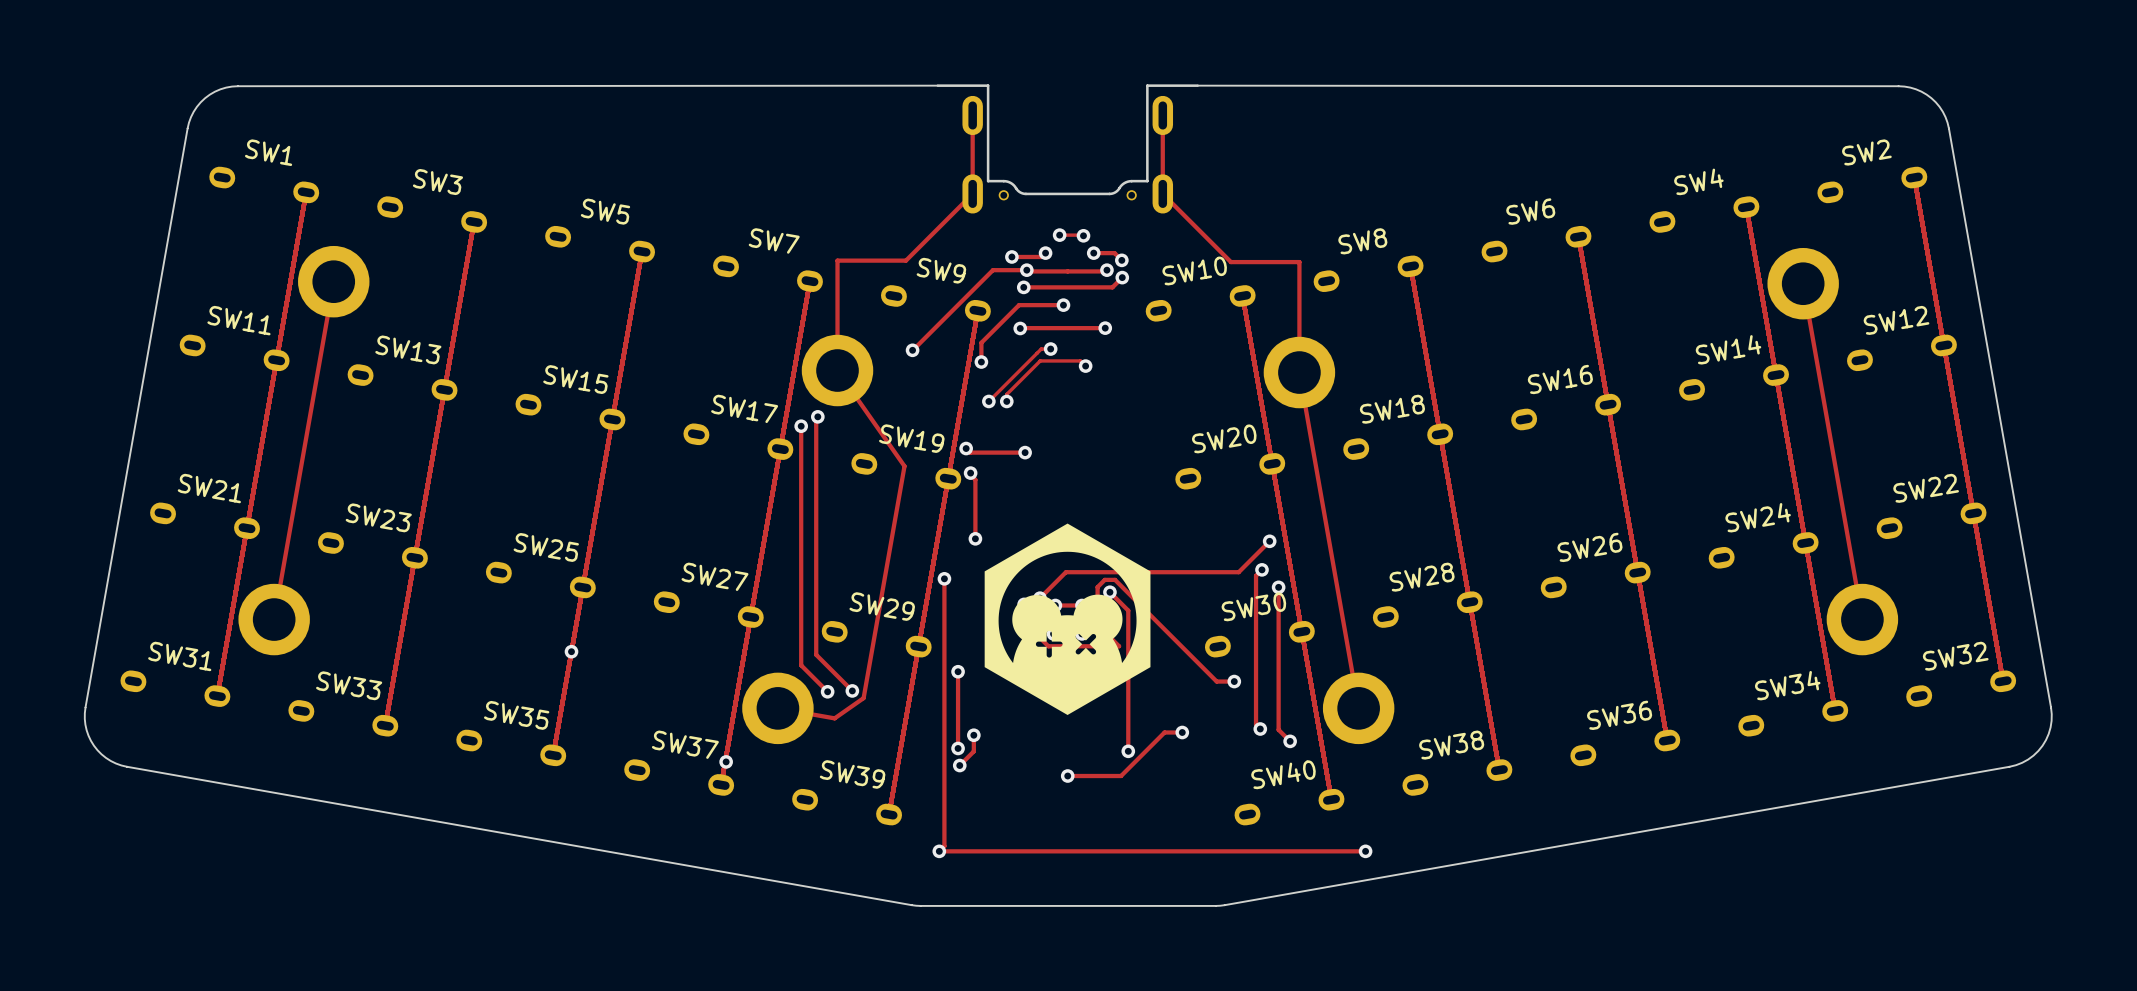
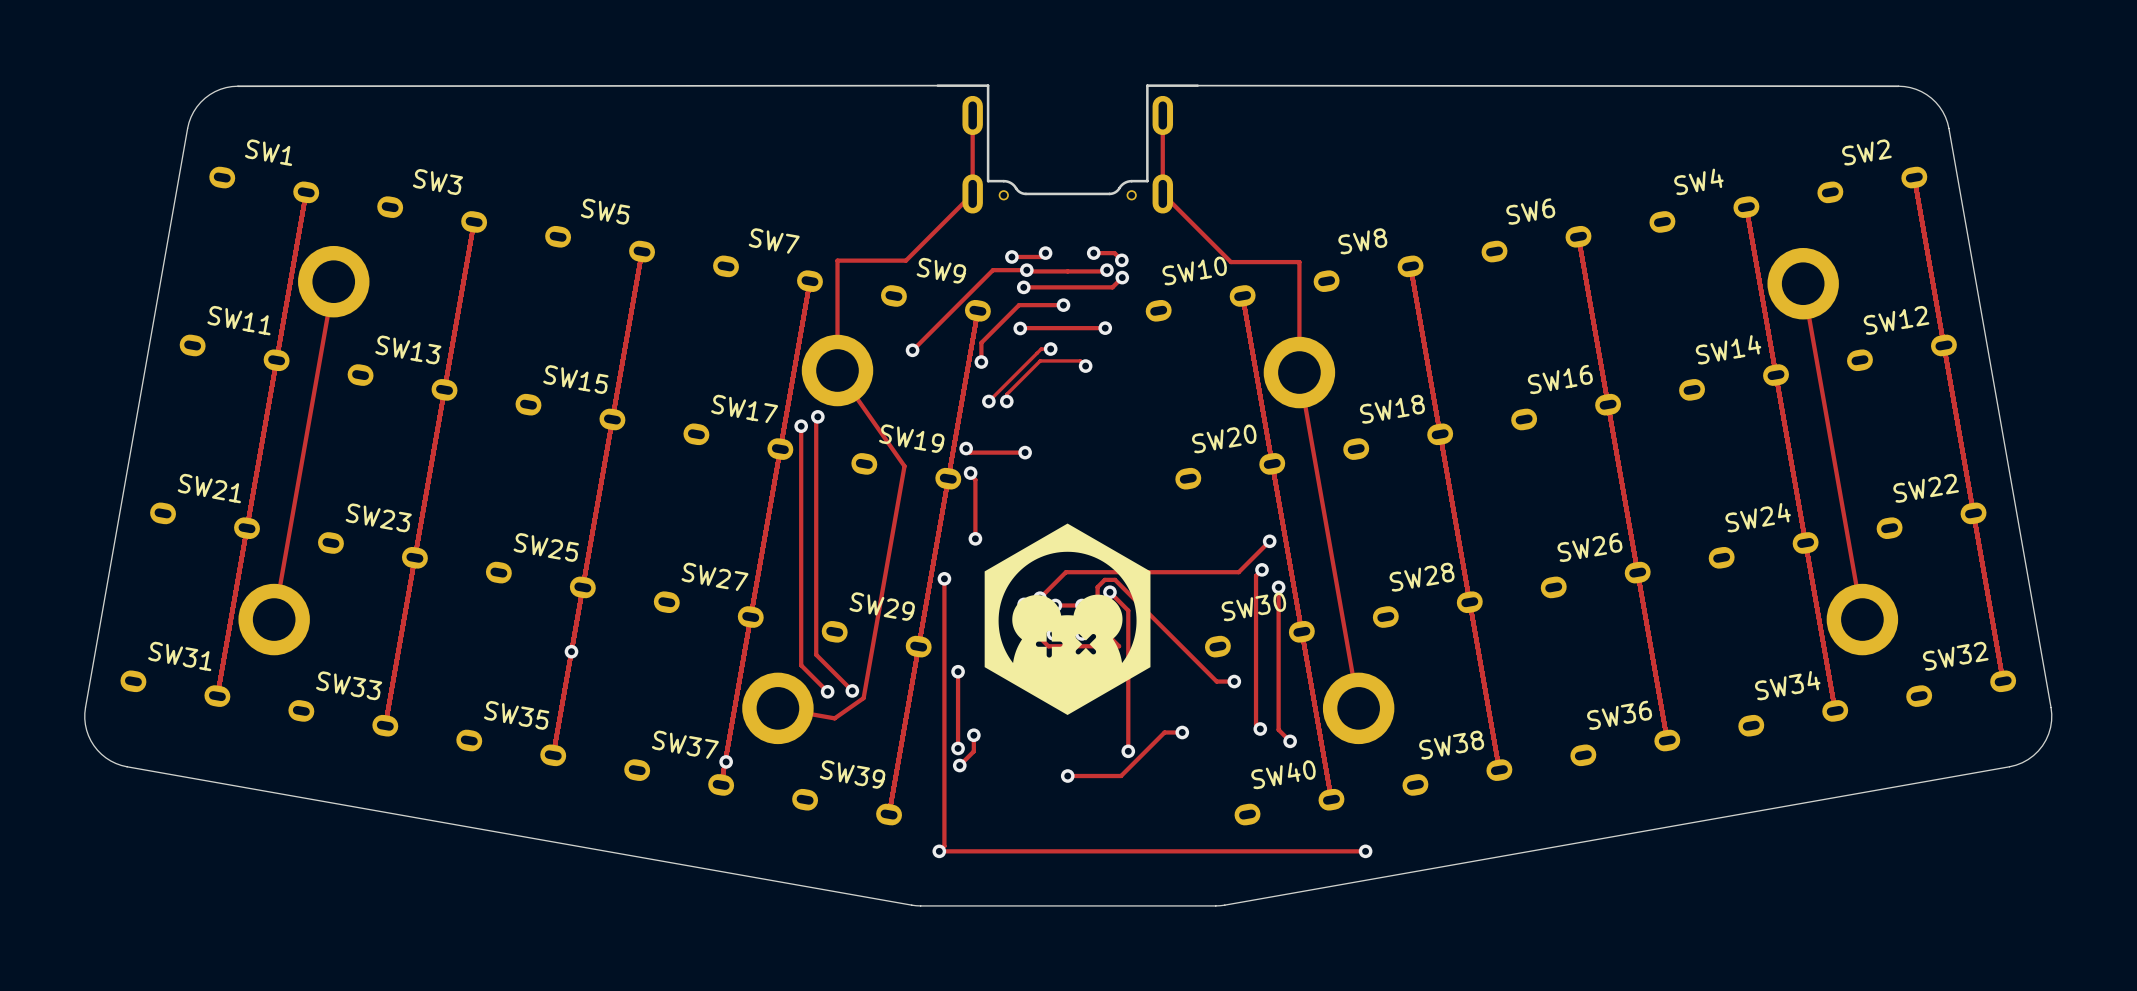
track: (1059, 235) (1083, 235) -> none
via: (1059, 235) -> none
via: (1083, 235) -> none

